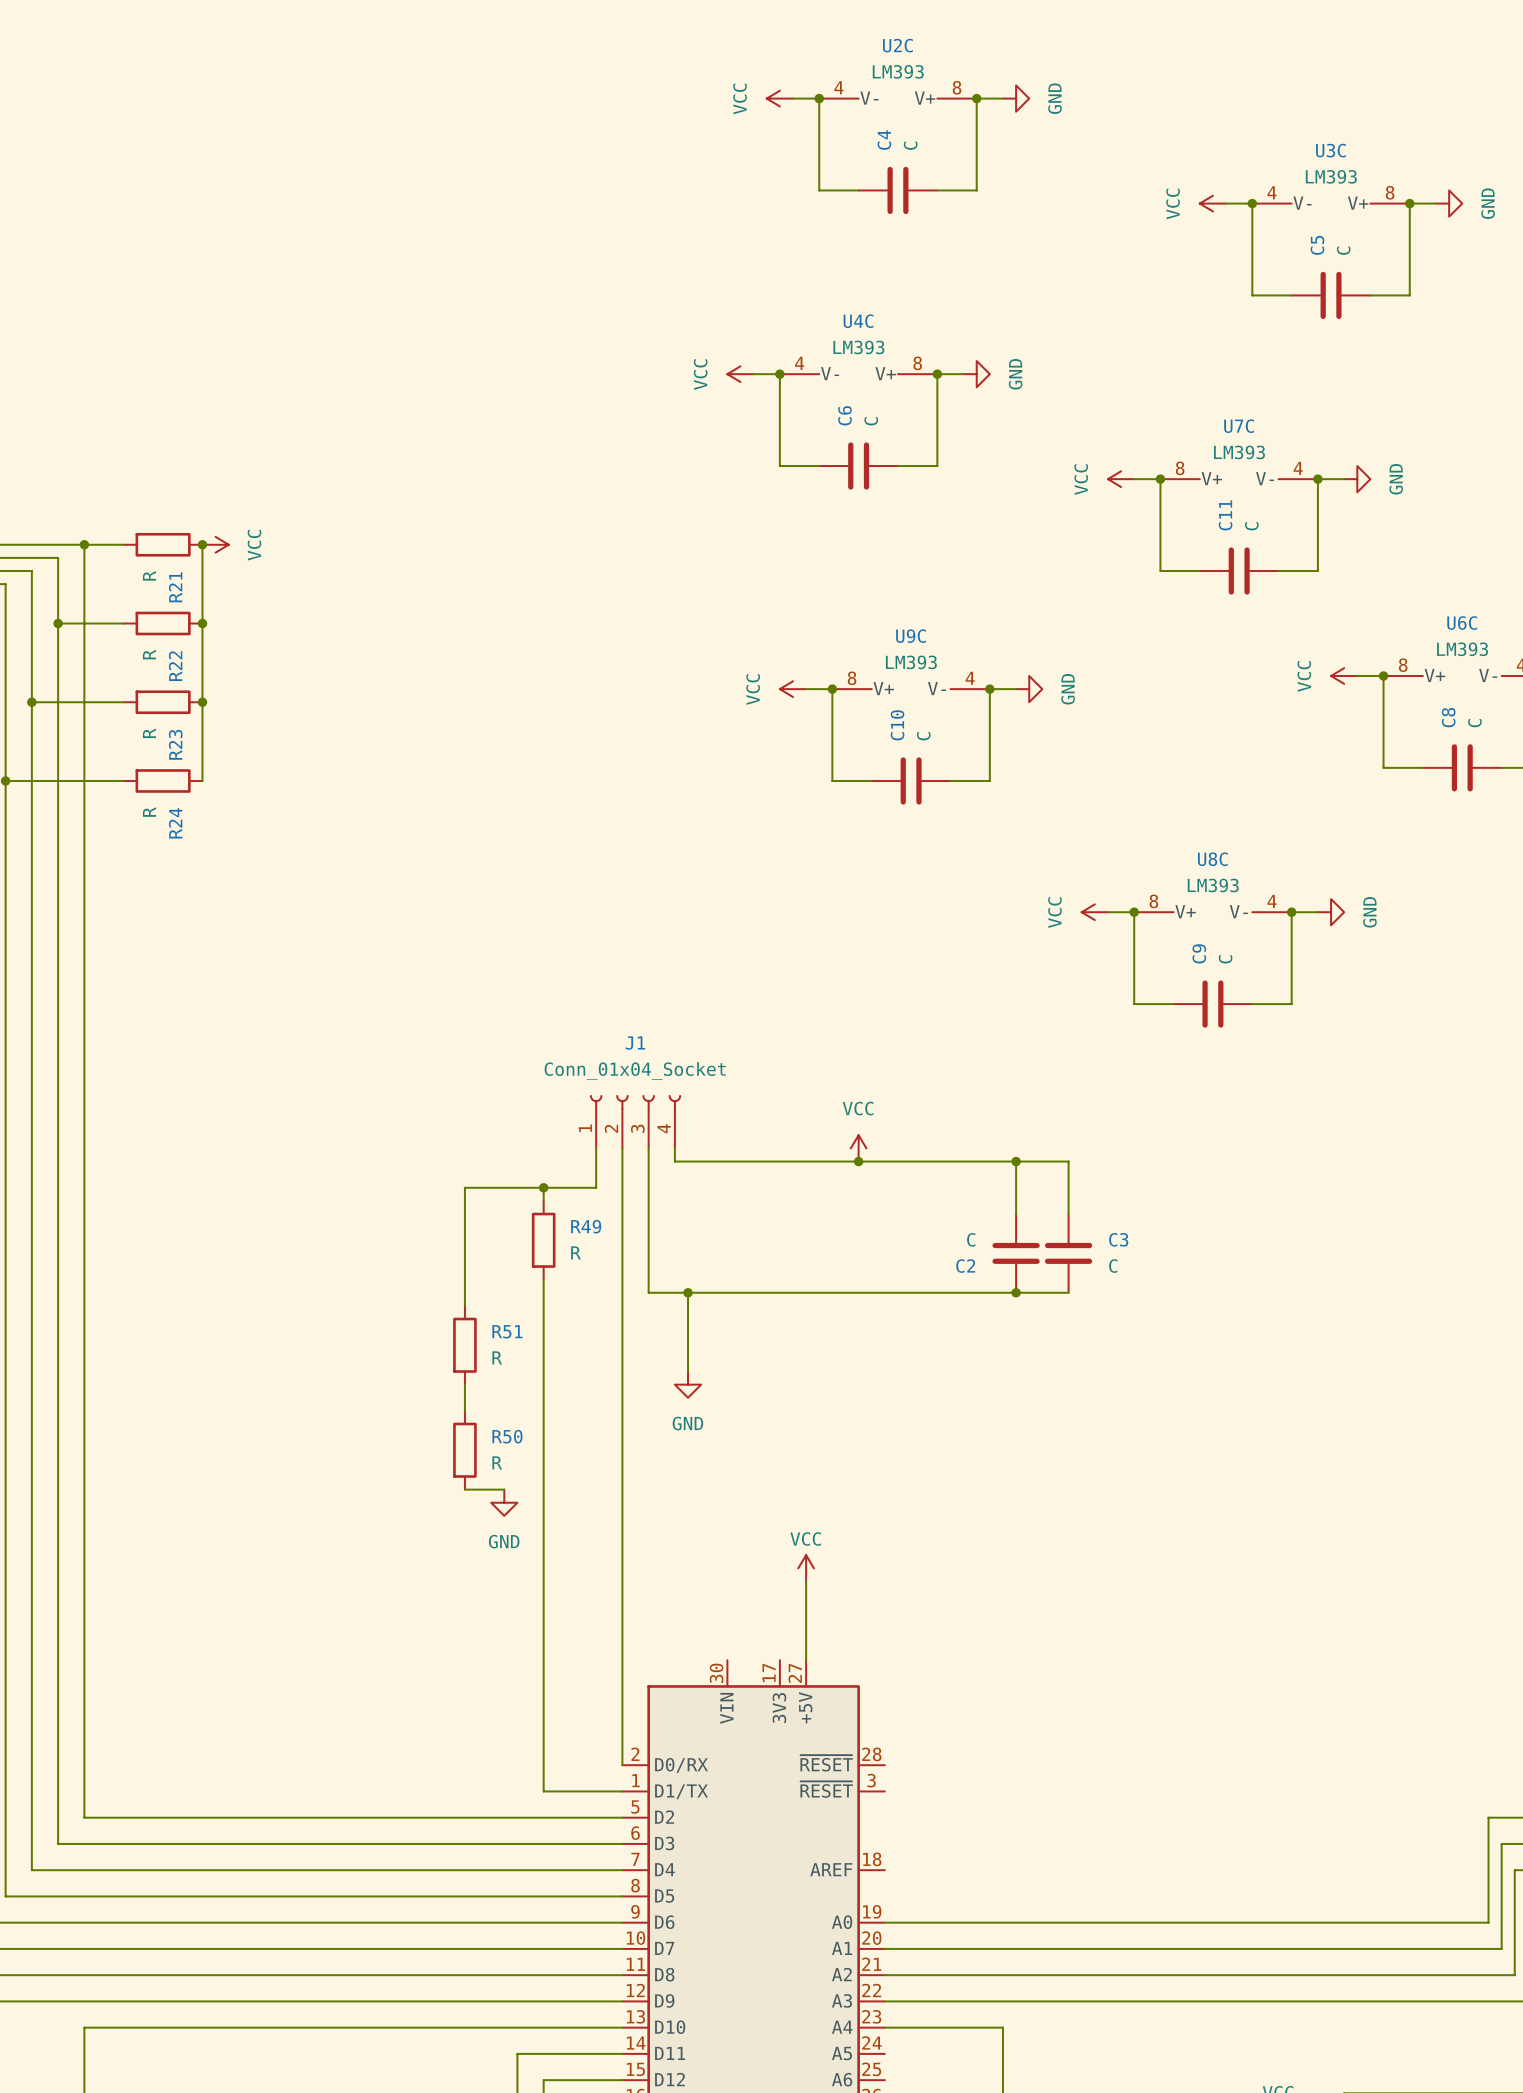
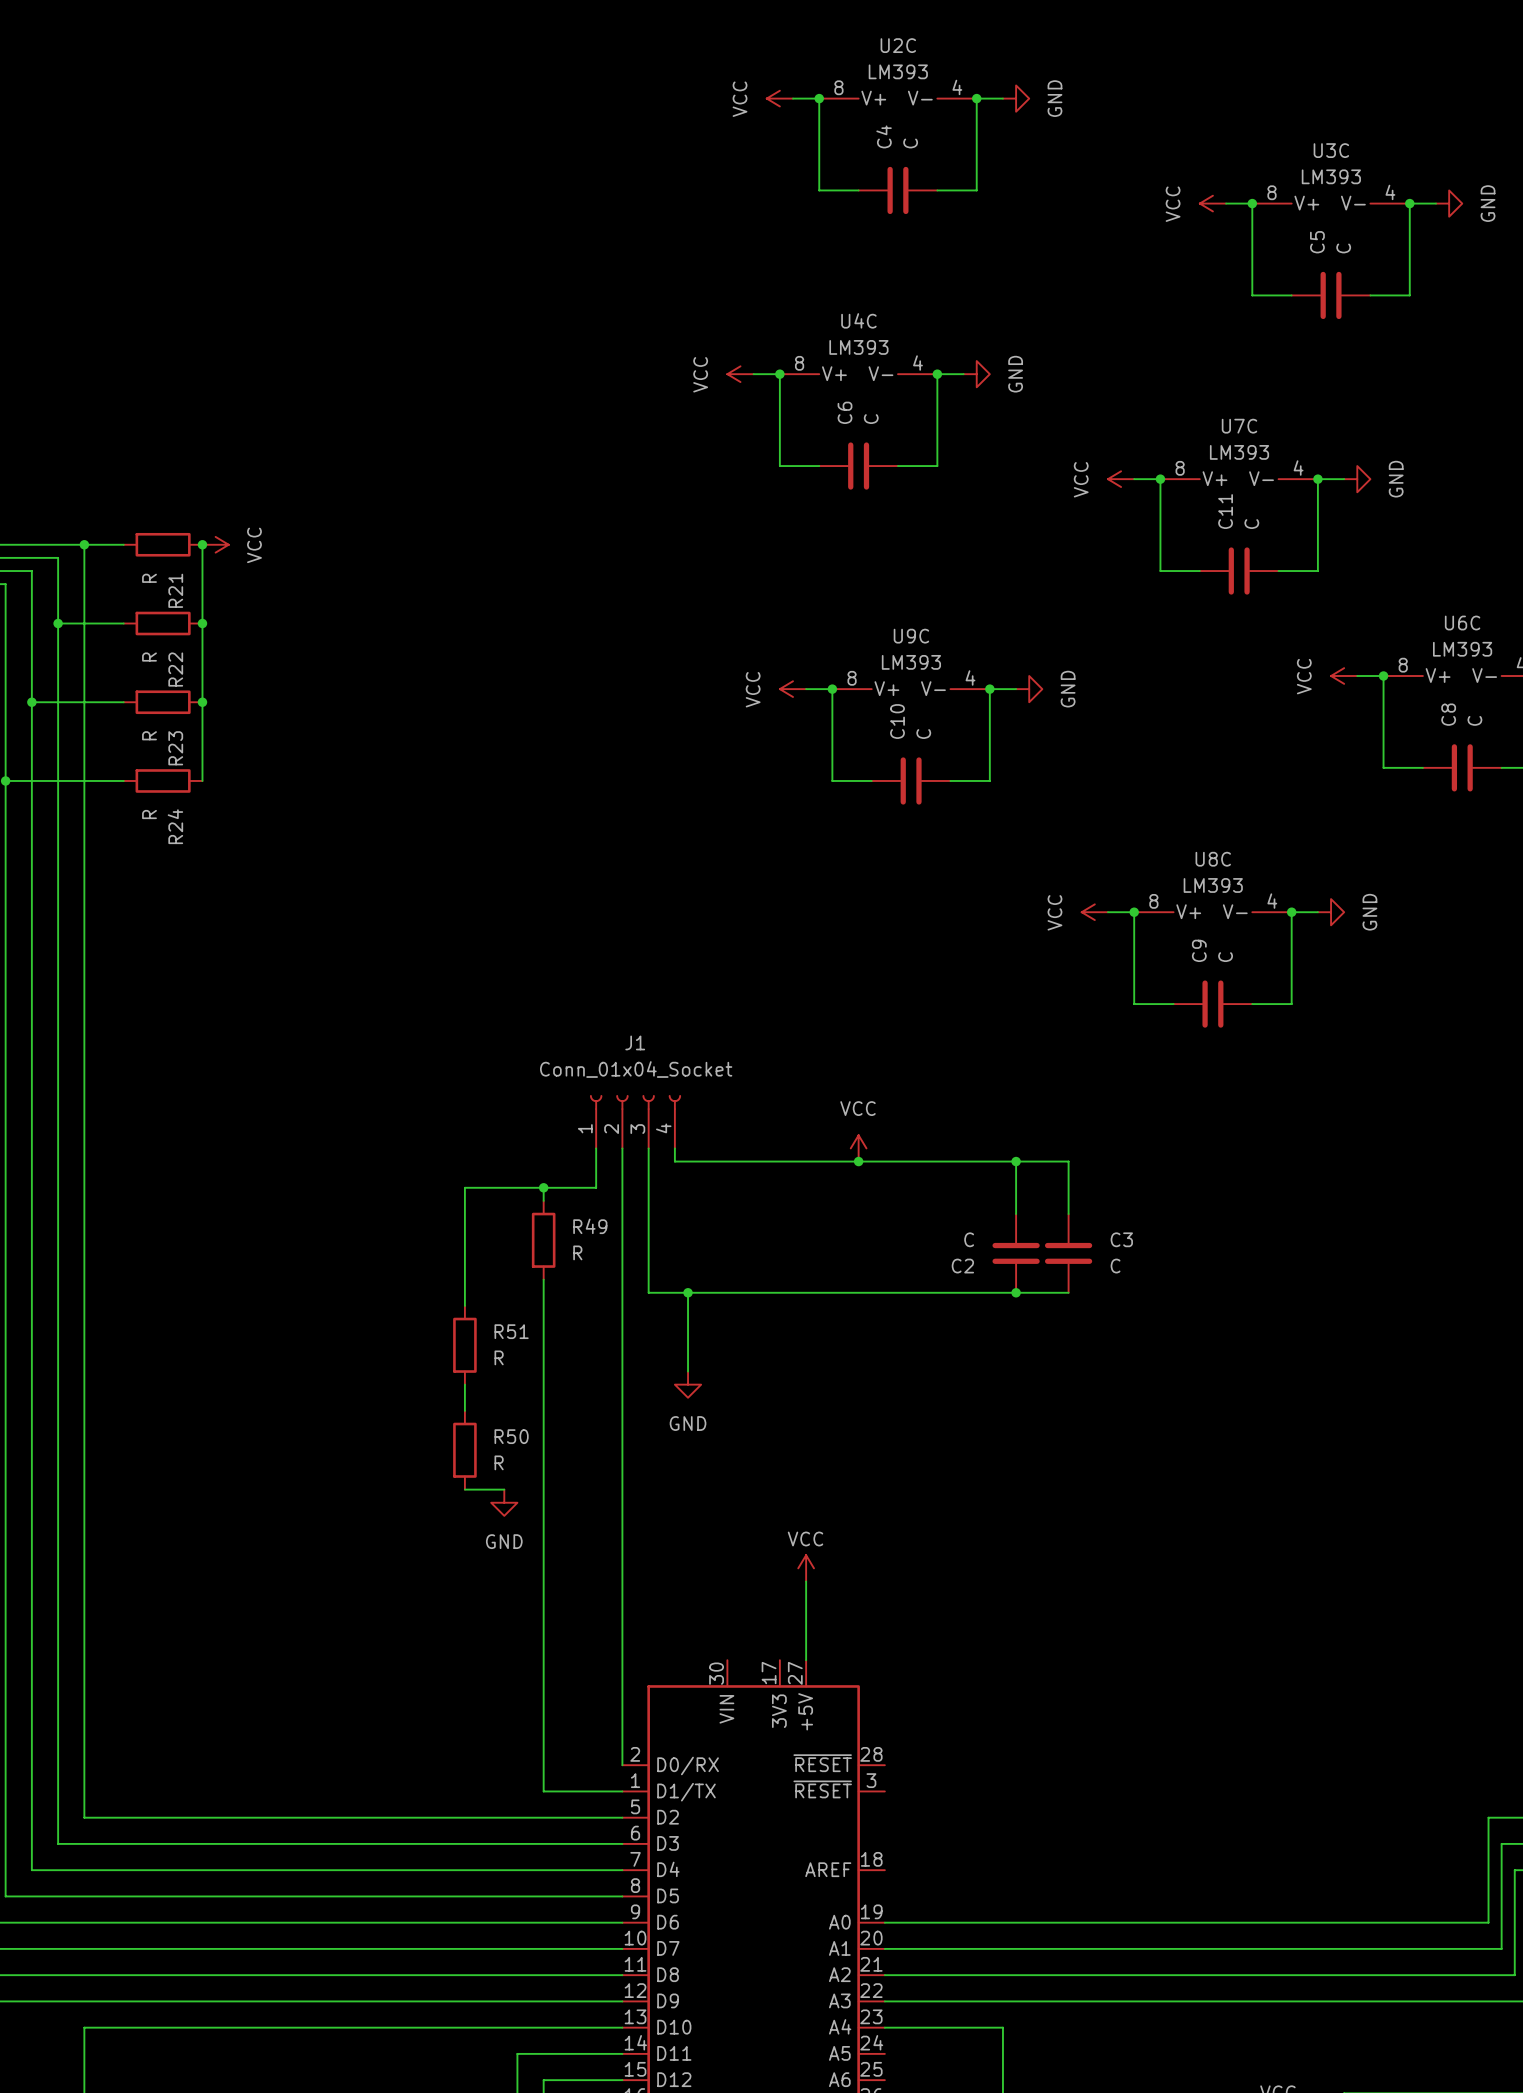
U2C rotation: 0° (897, 98) -> 180° (897, 98)
U3C rotation: 0° (1331, 203) -> 180° (1331, 203)
U4C rotation: 0° (858, 374) -> 180° (858, 374)

